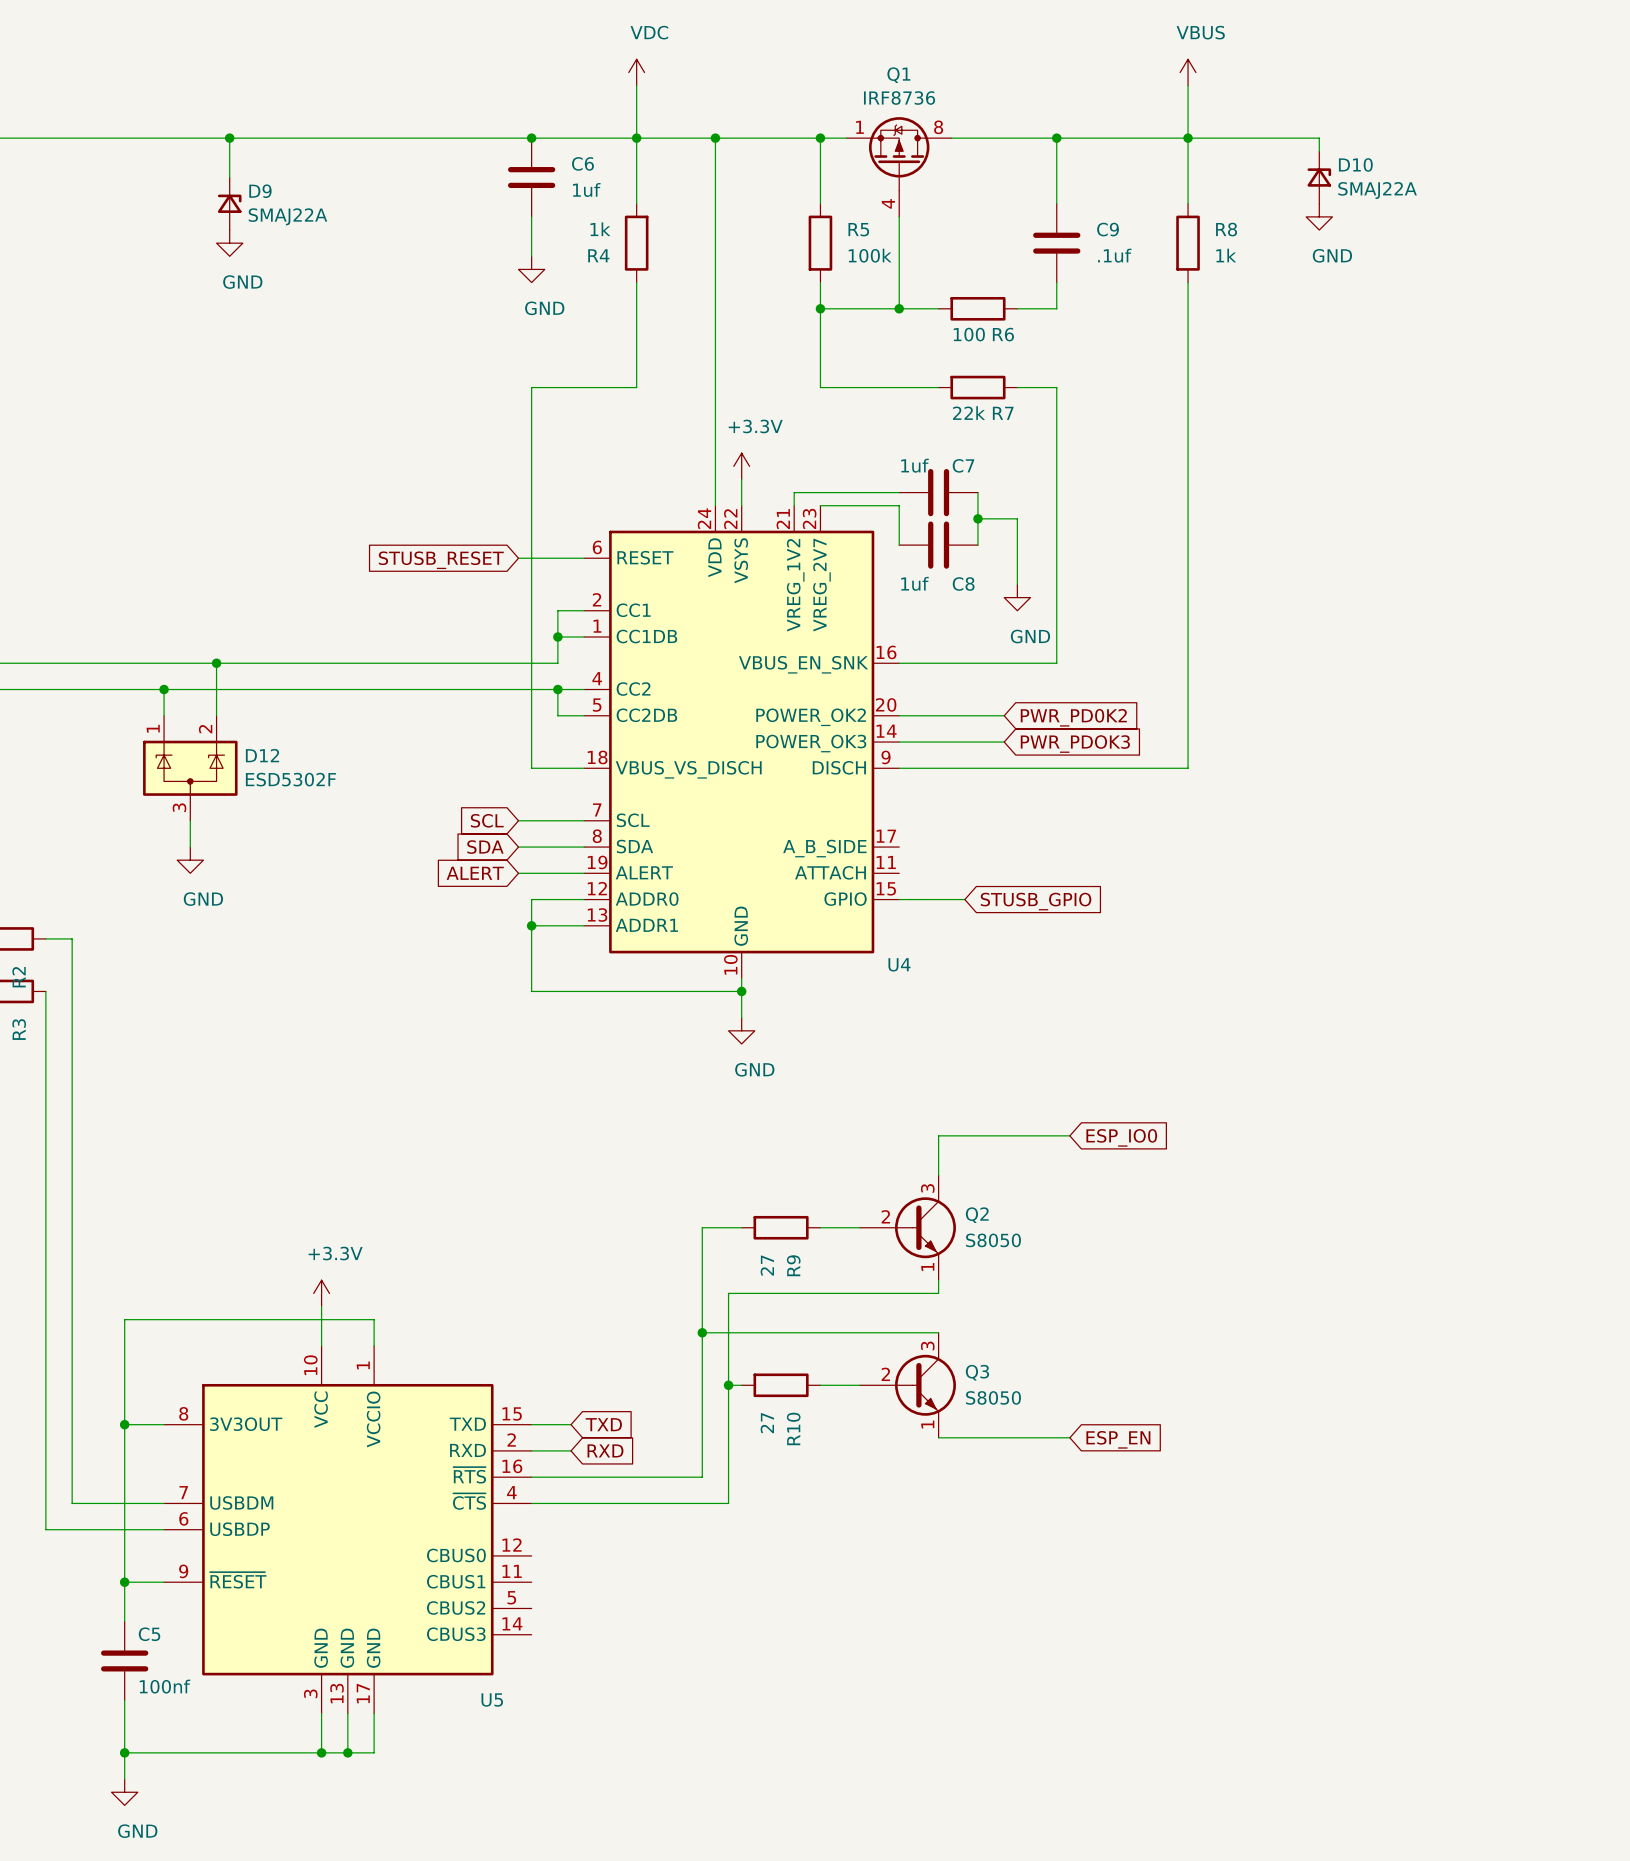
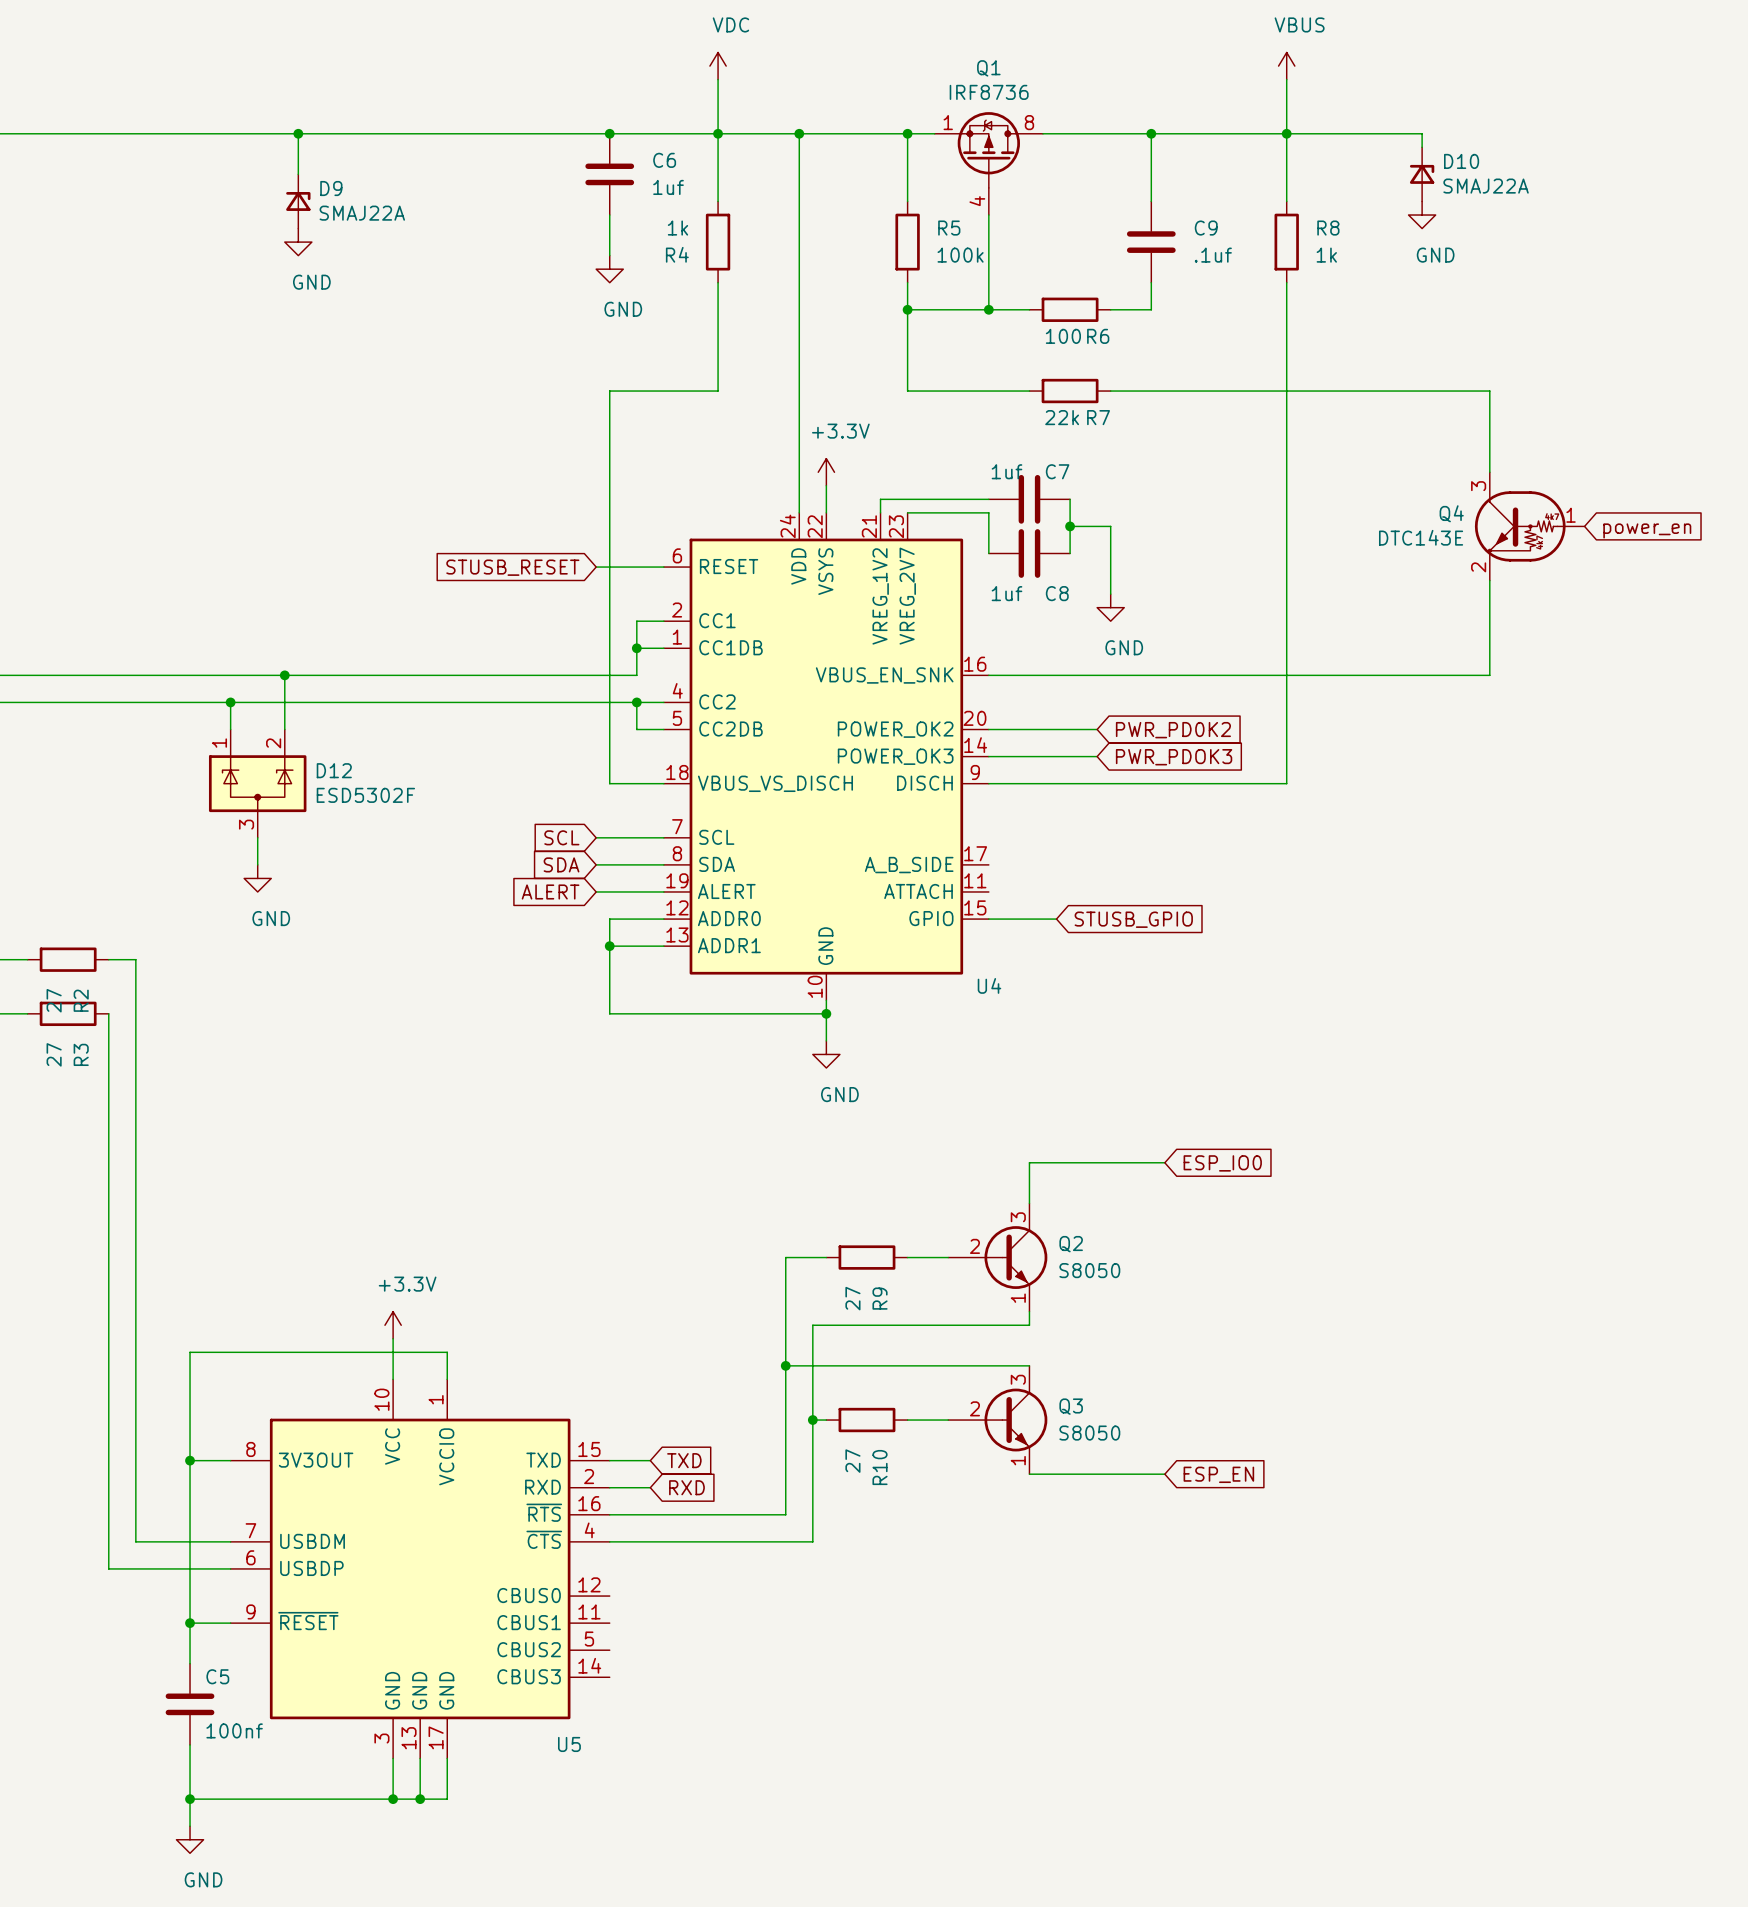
wire: (1056, 387) (1056, 663) -> (1489, 580) (1489, 675) (1151, 675)
wire: none -> (1151, 391) (1489, 391) (1489, 472)
Q4: none -> DTC143E (1529, 526)
global label: none -> power_en (1647, 530)

